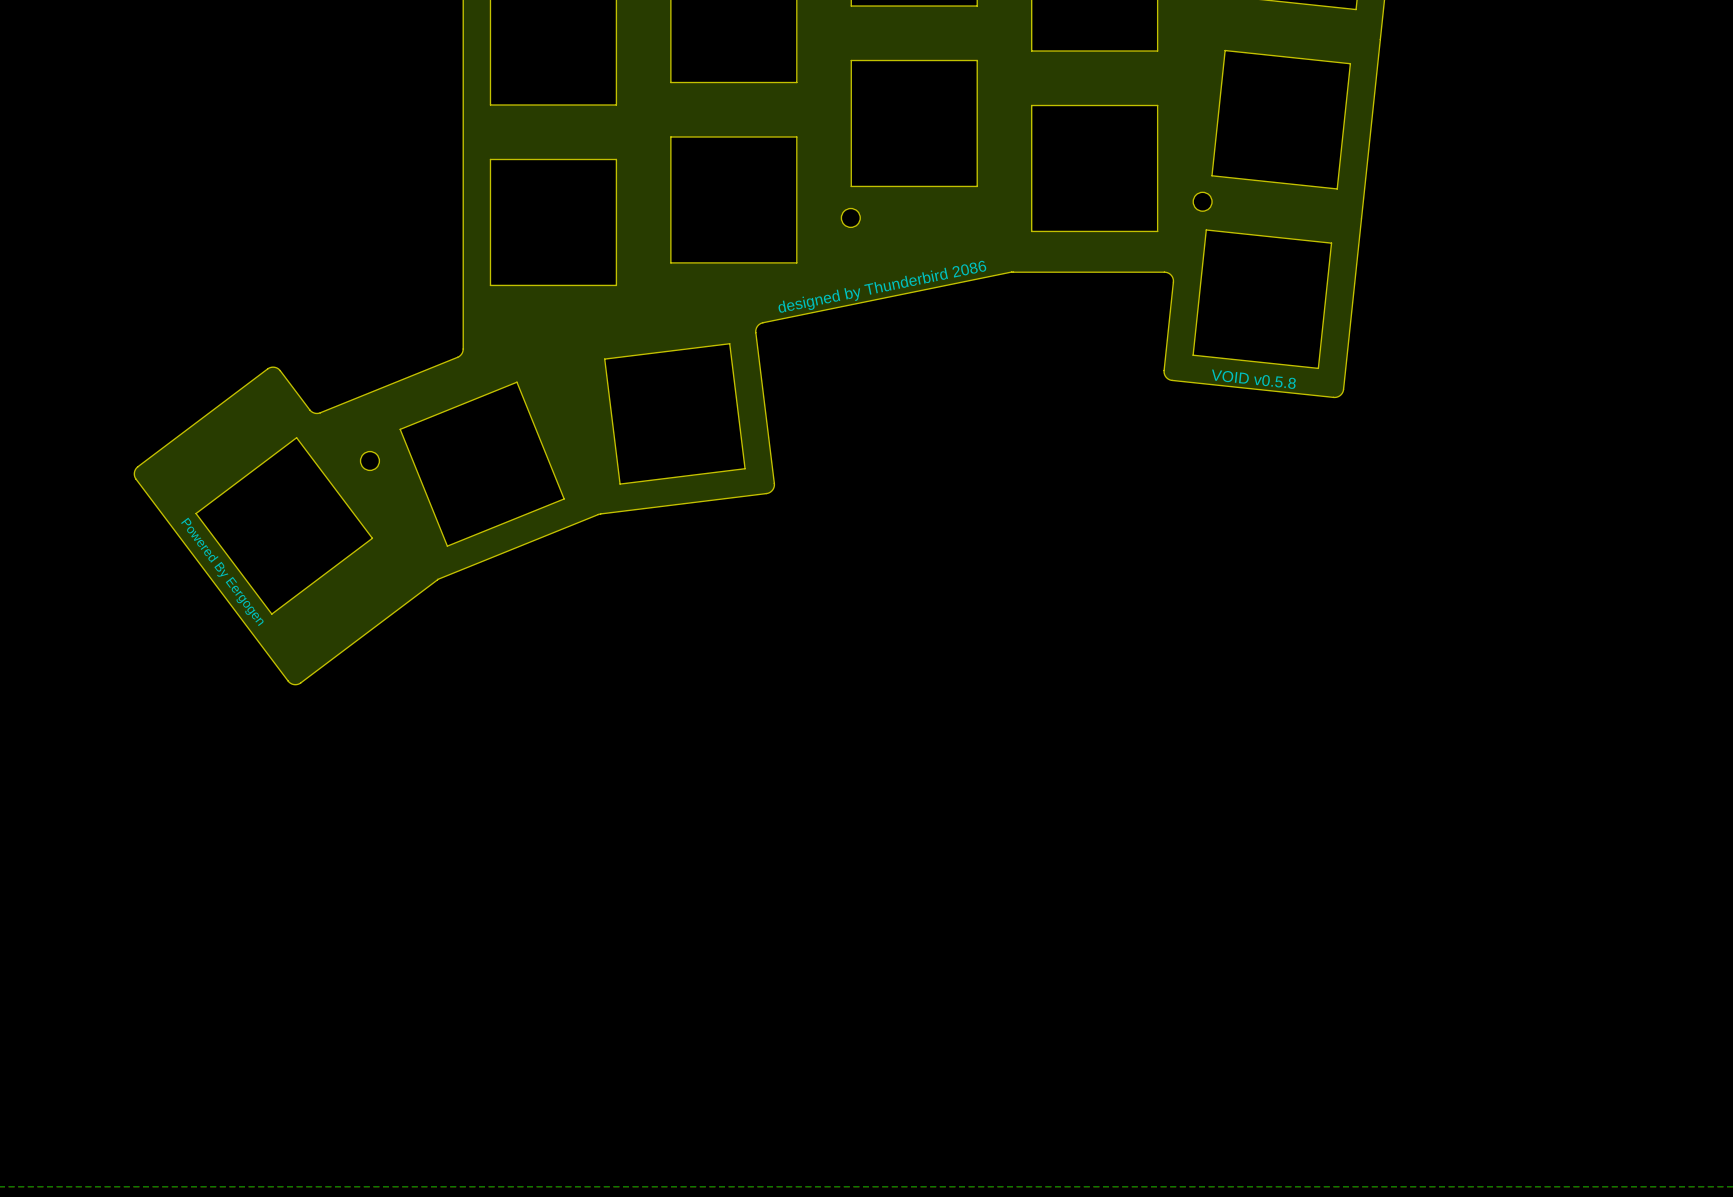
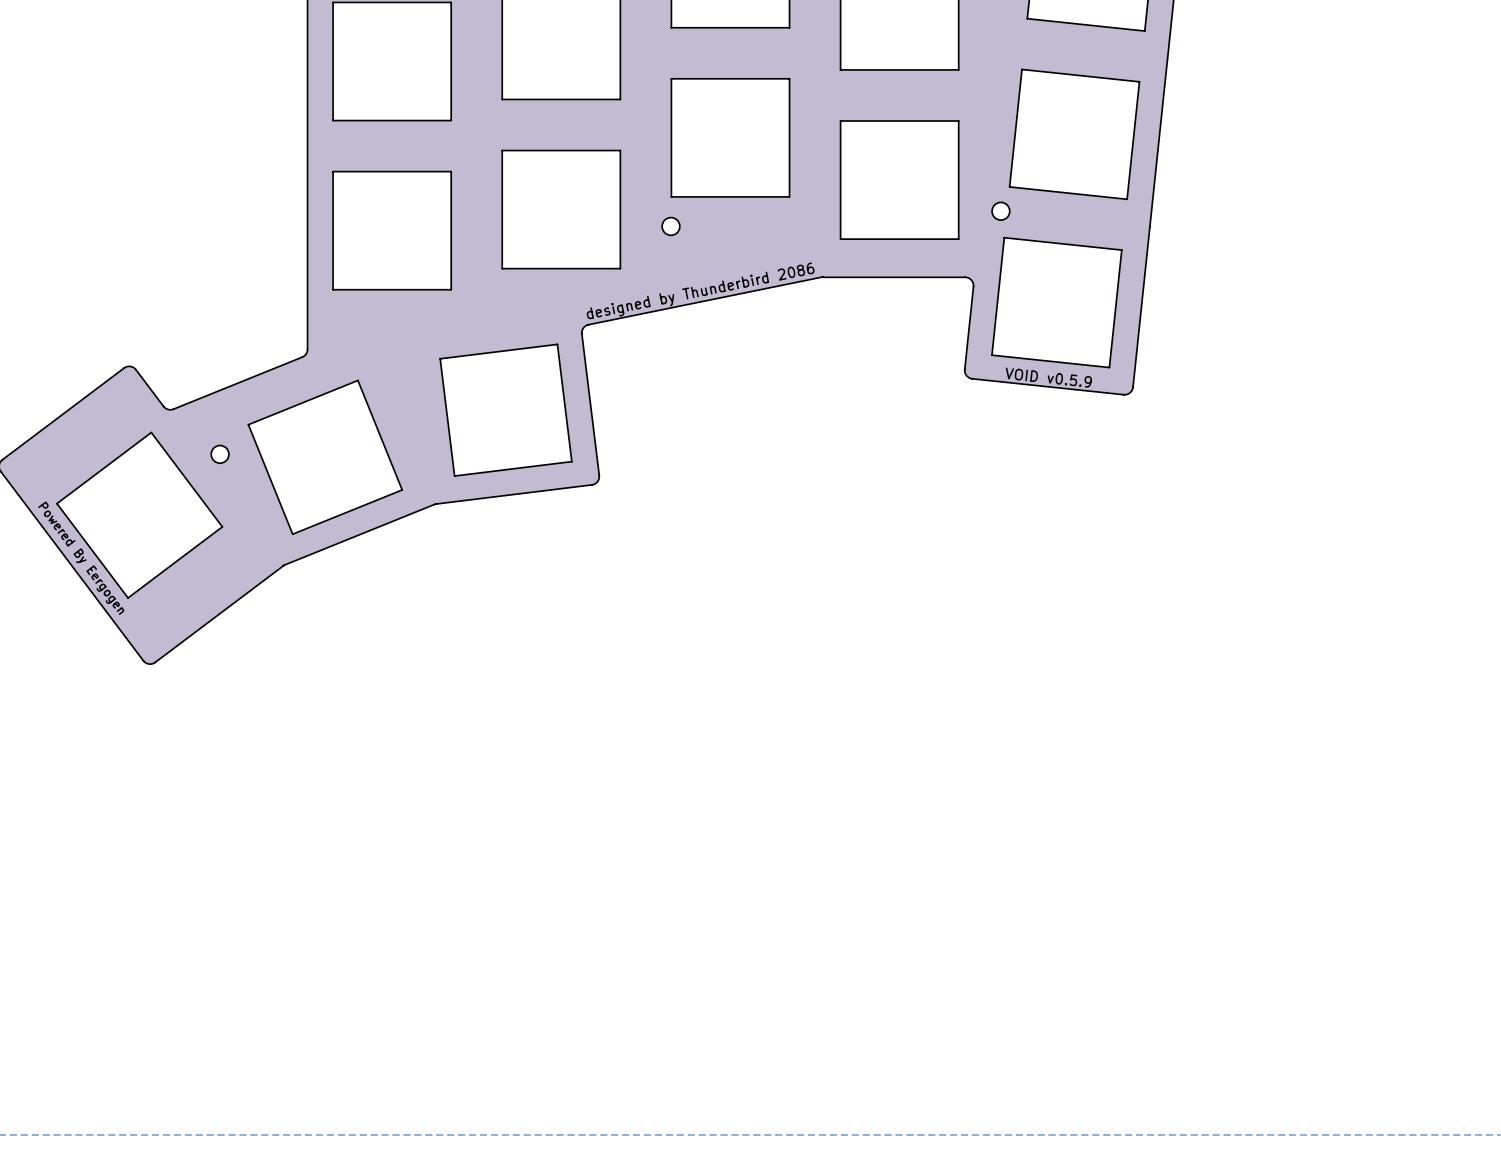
text: VOID v0.5.8 (1253, 379) -> VOID v0.5.9 (1048, 377)

